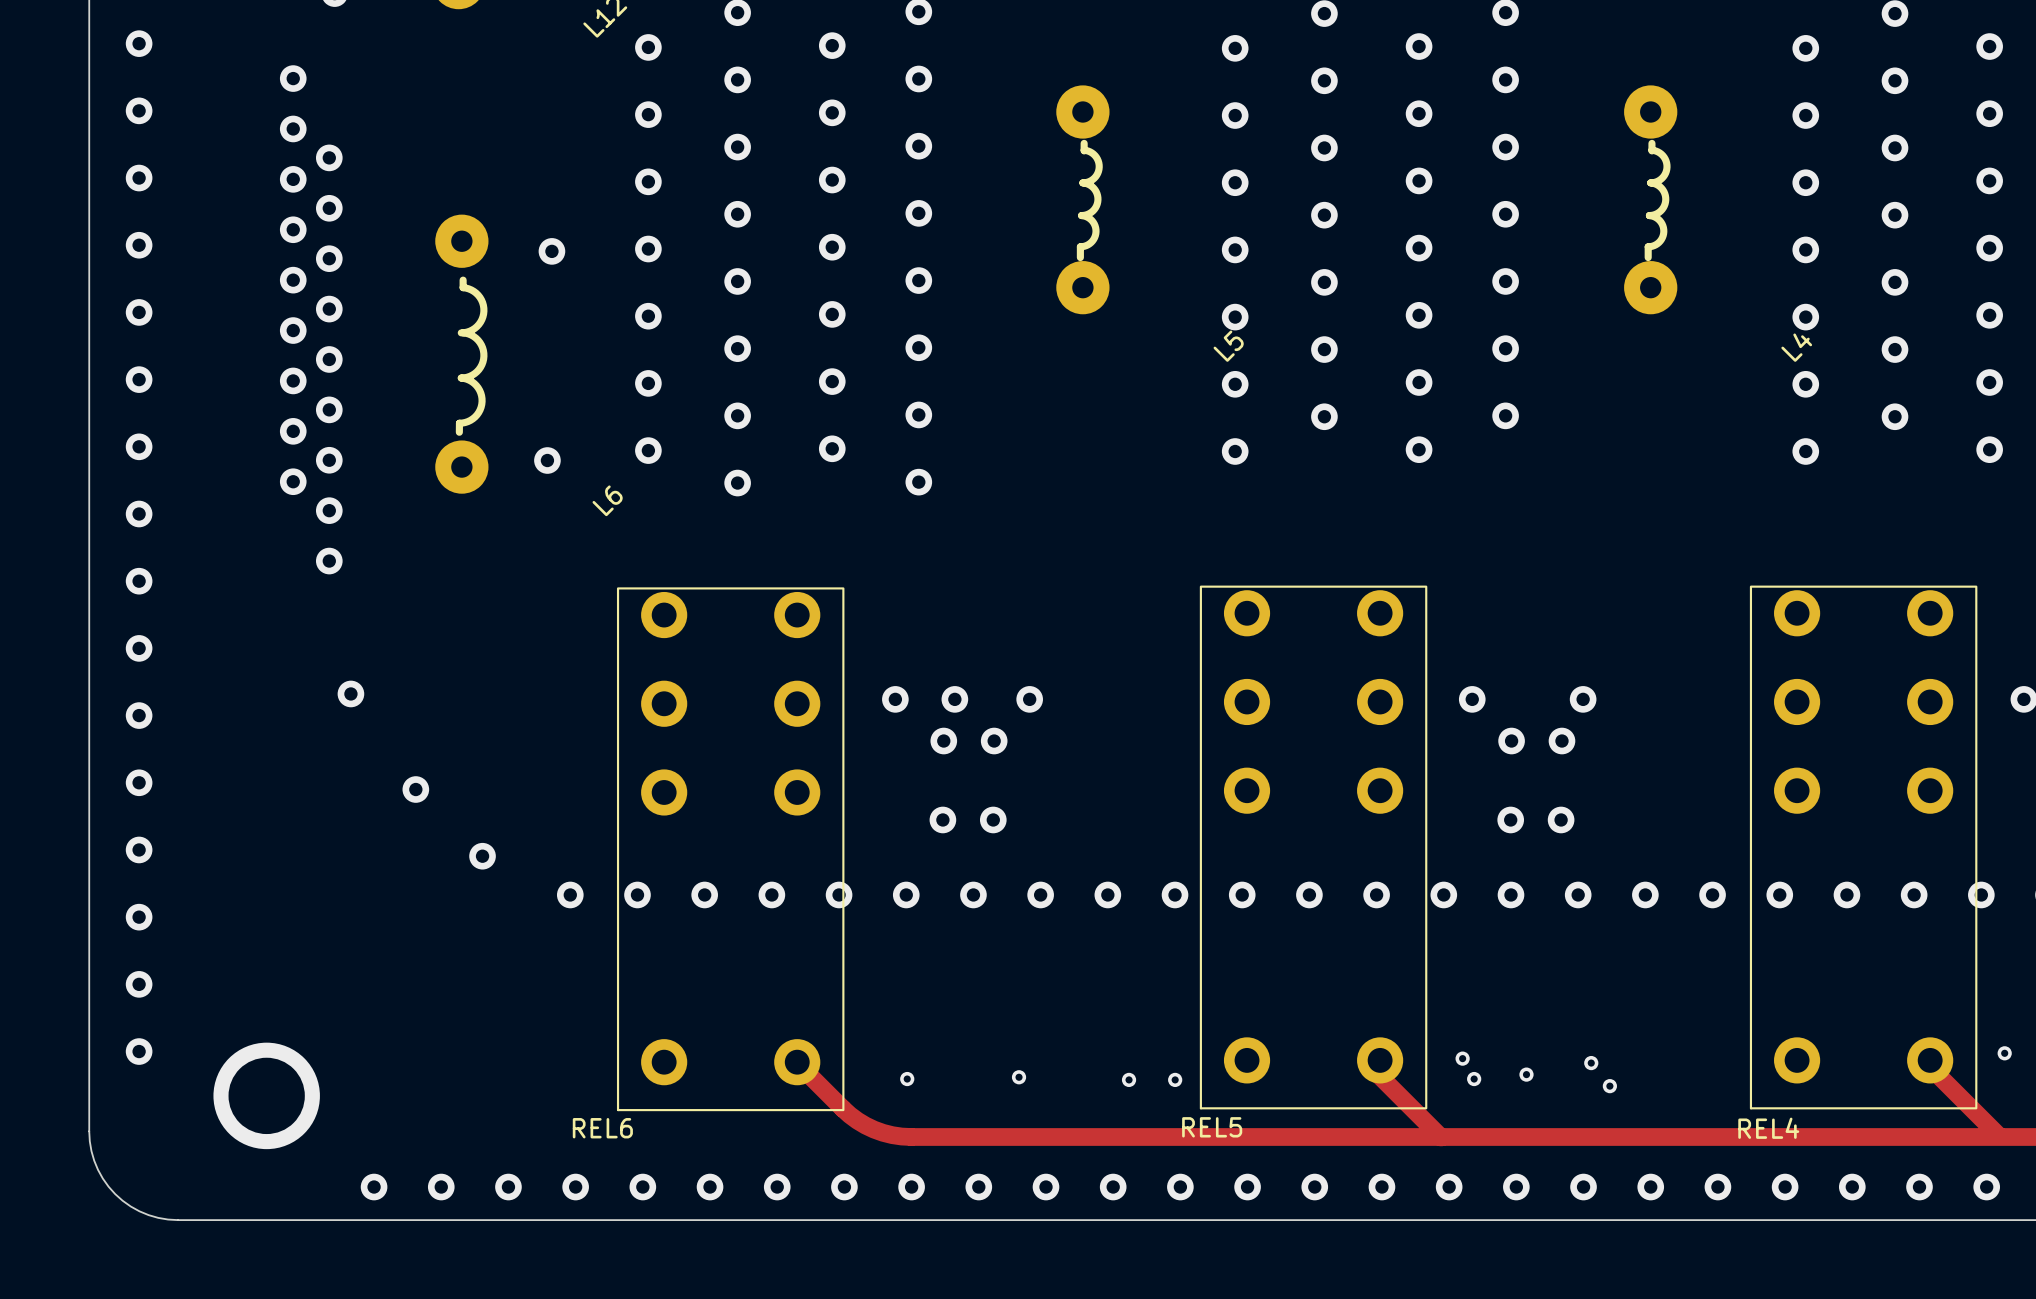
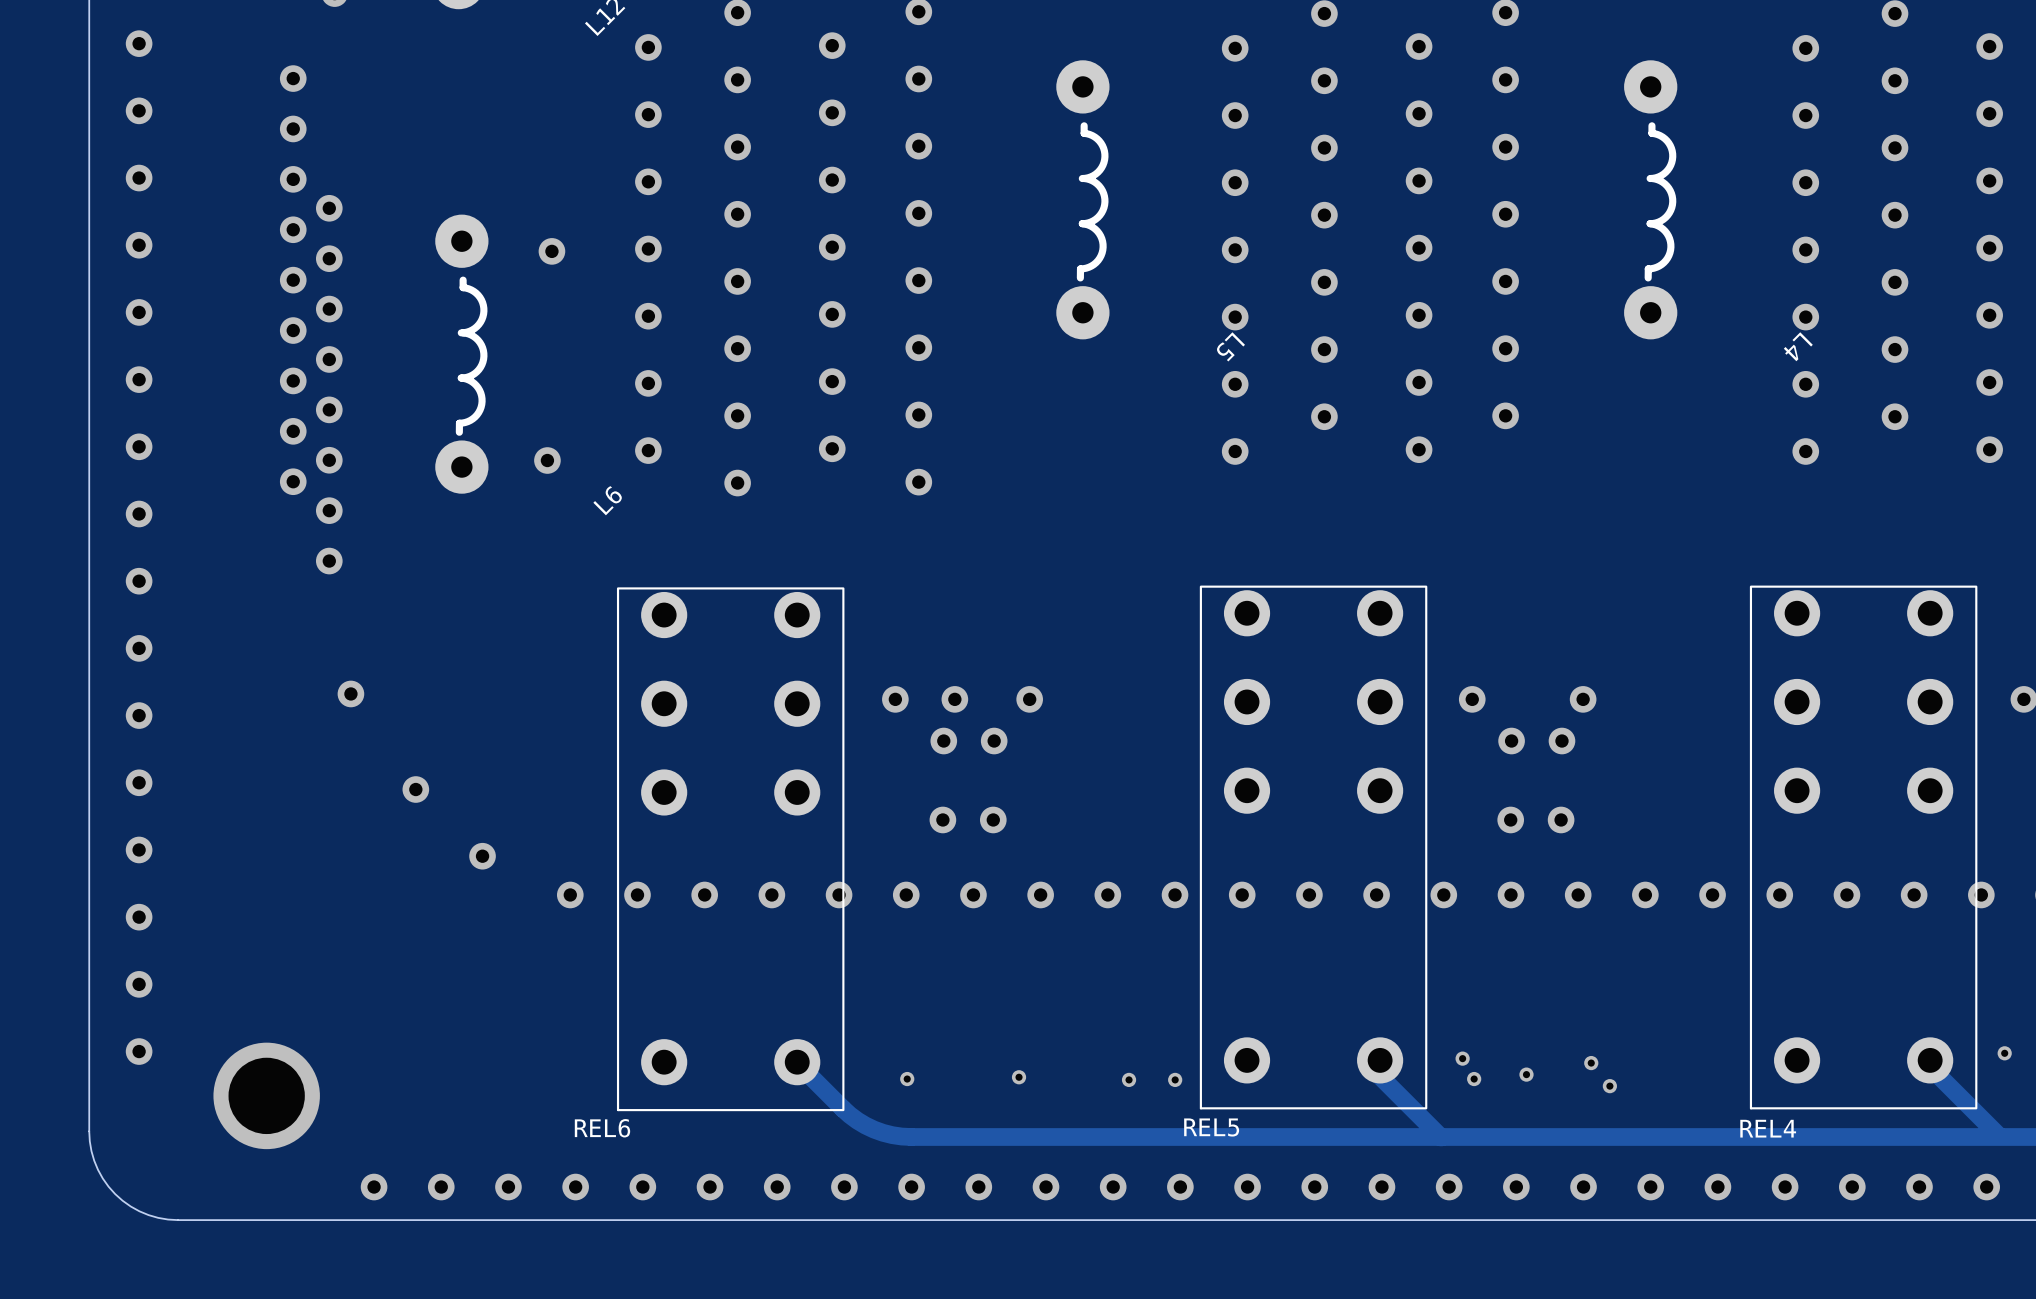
L5 footprint: [1056, 85, 1110, 315] -> [1056, 60, 1110, 340]
L4 footprint: [1624, 85, 1678, 315] -> [1624, 60, 1678, 340]
via: (329, 157) -> none

